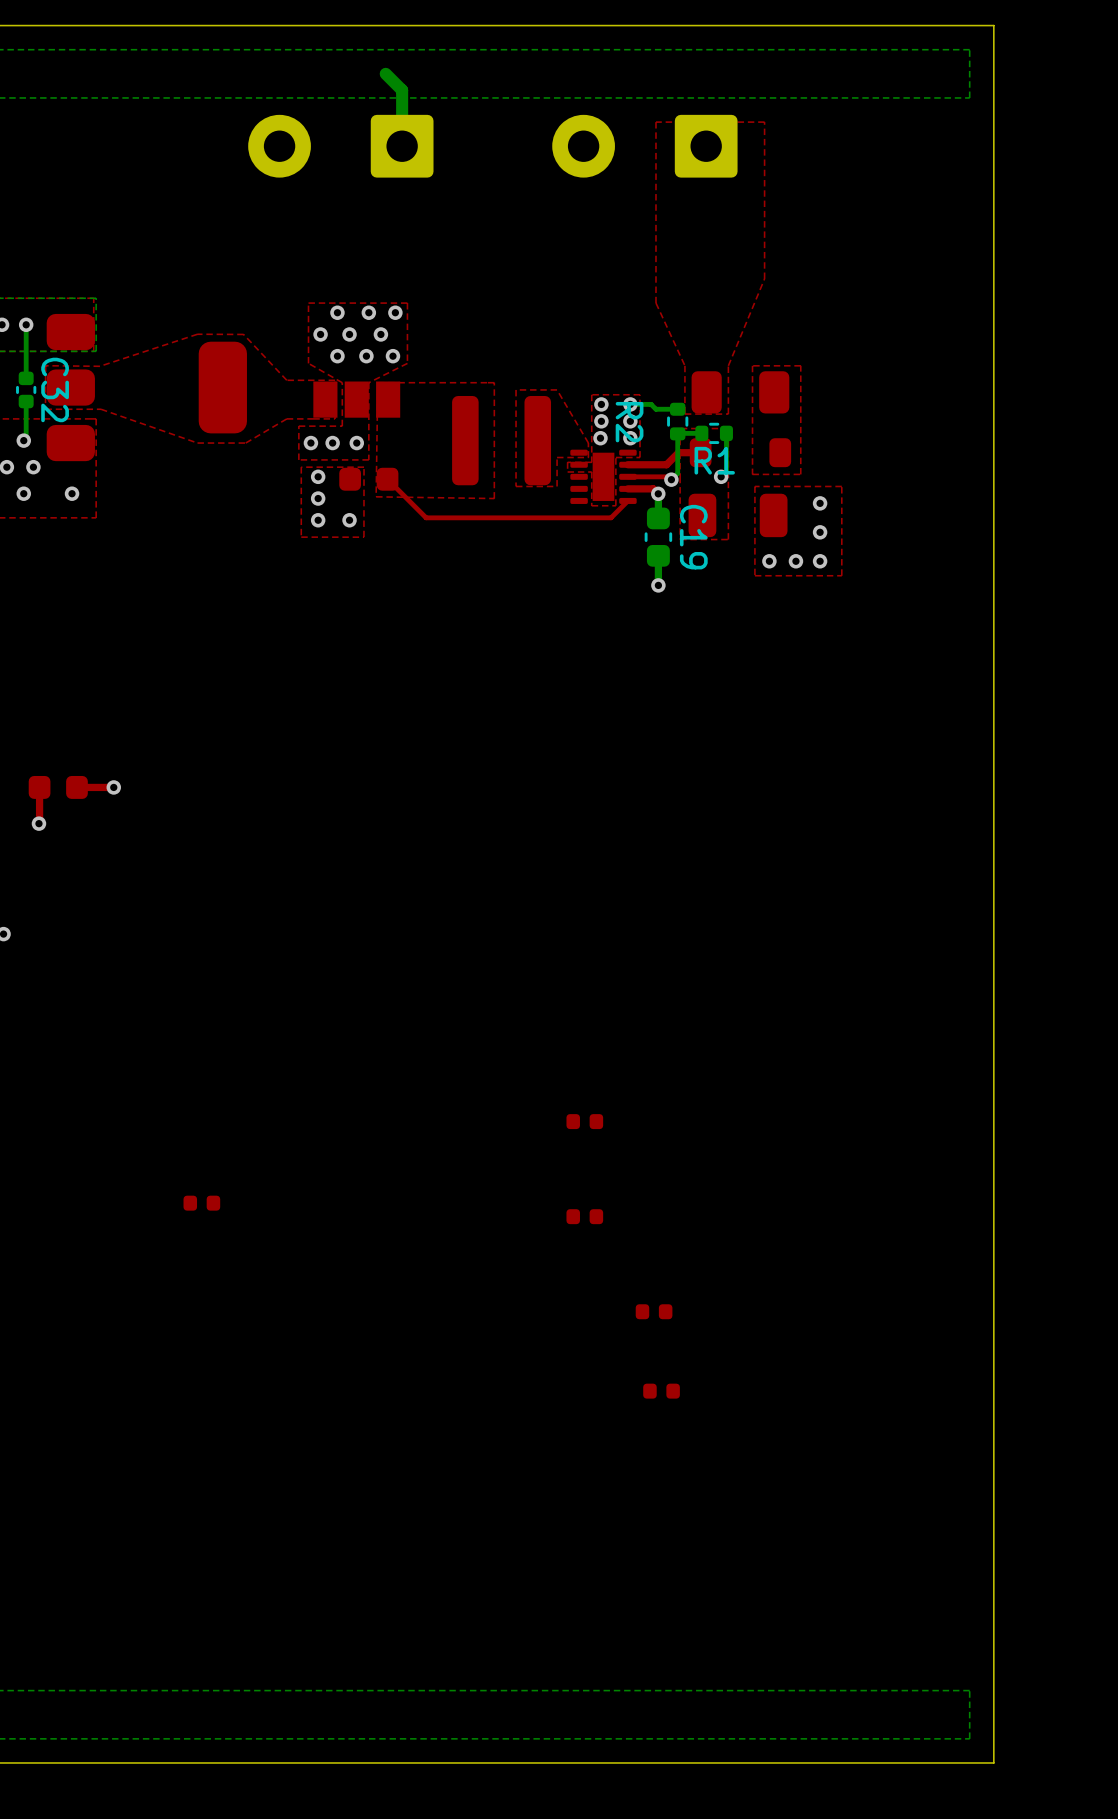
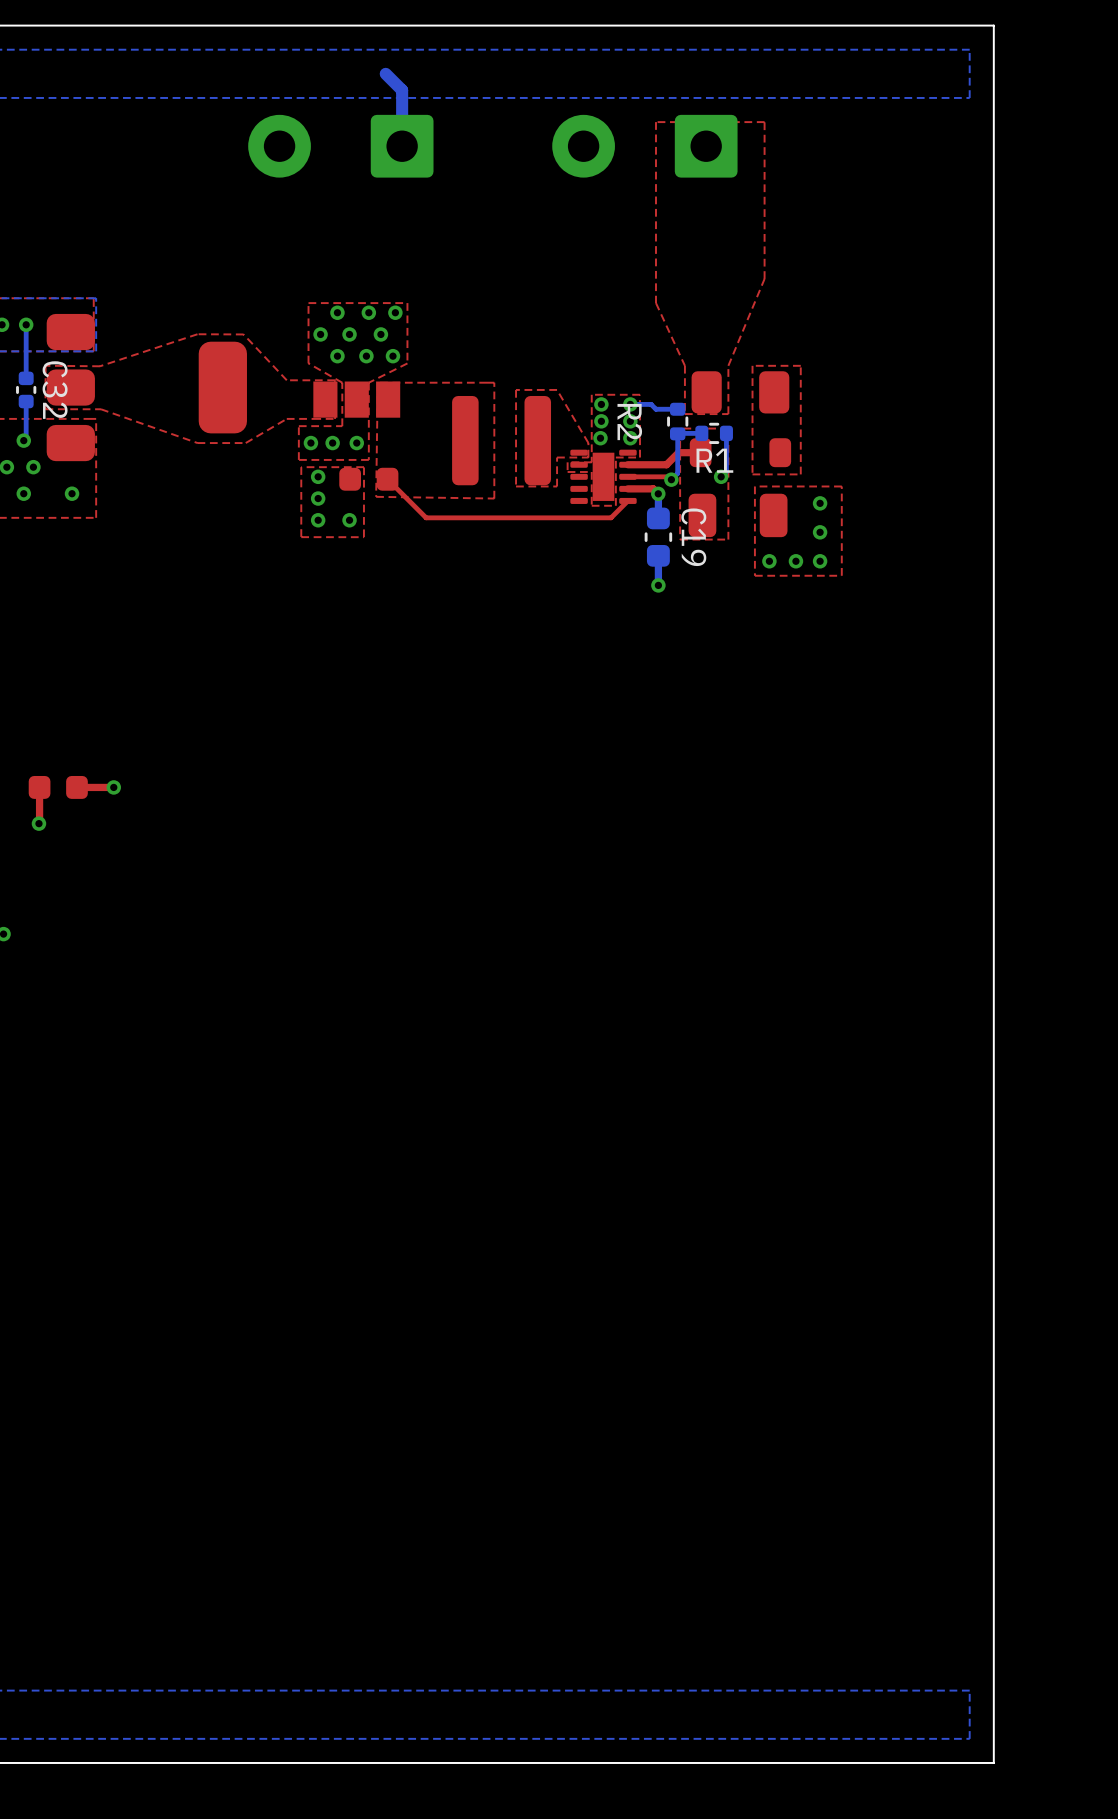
part: (584, 1121) -> none
part: (201, 1203) -> none
part: (584, 1216) -> none
part: (654, 1311) -> none
part: (661, 1391) -> none

